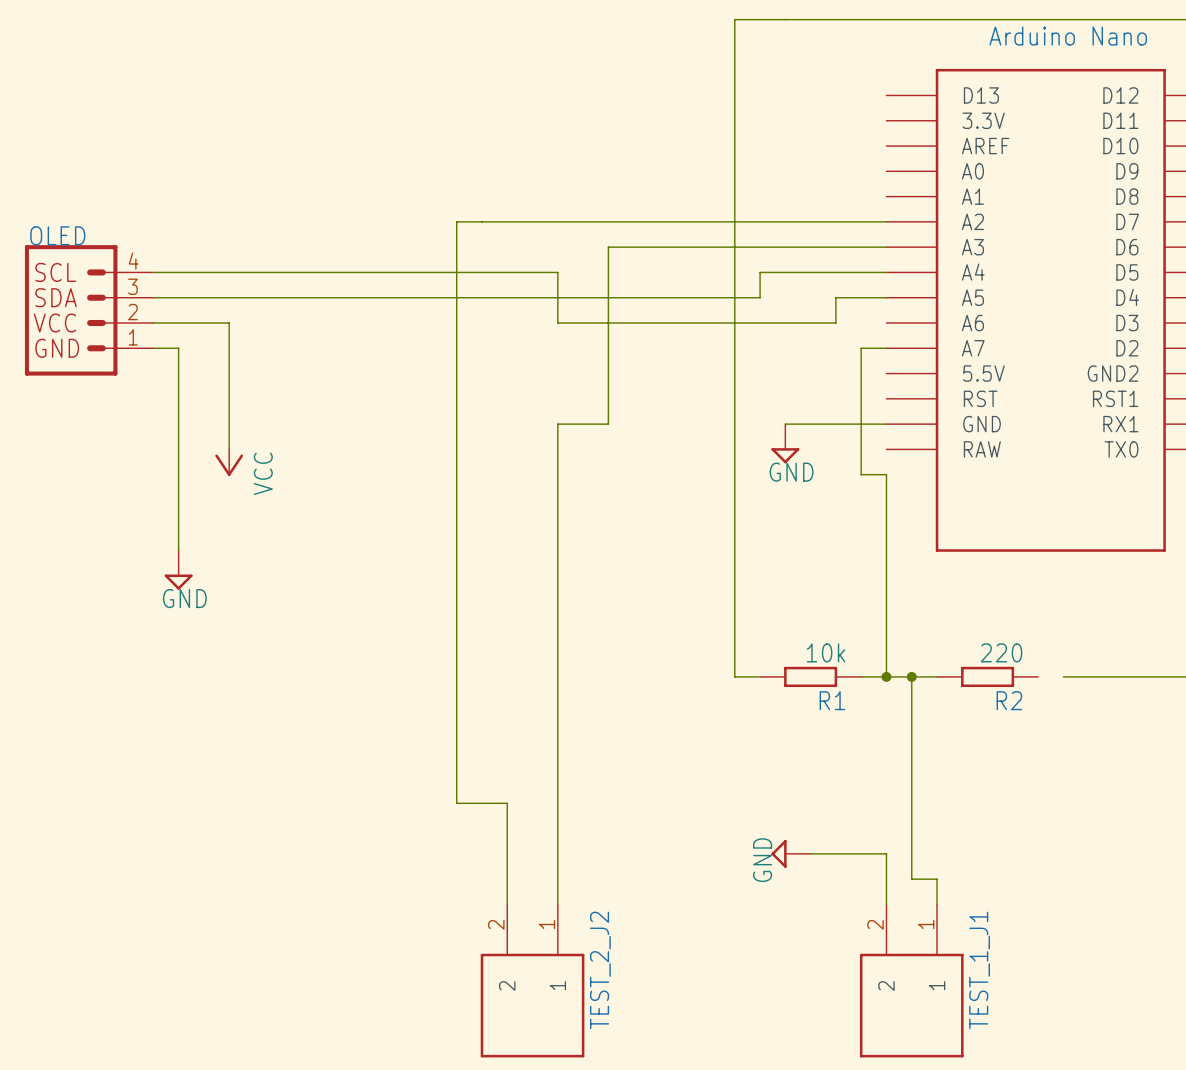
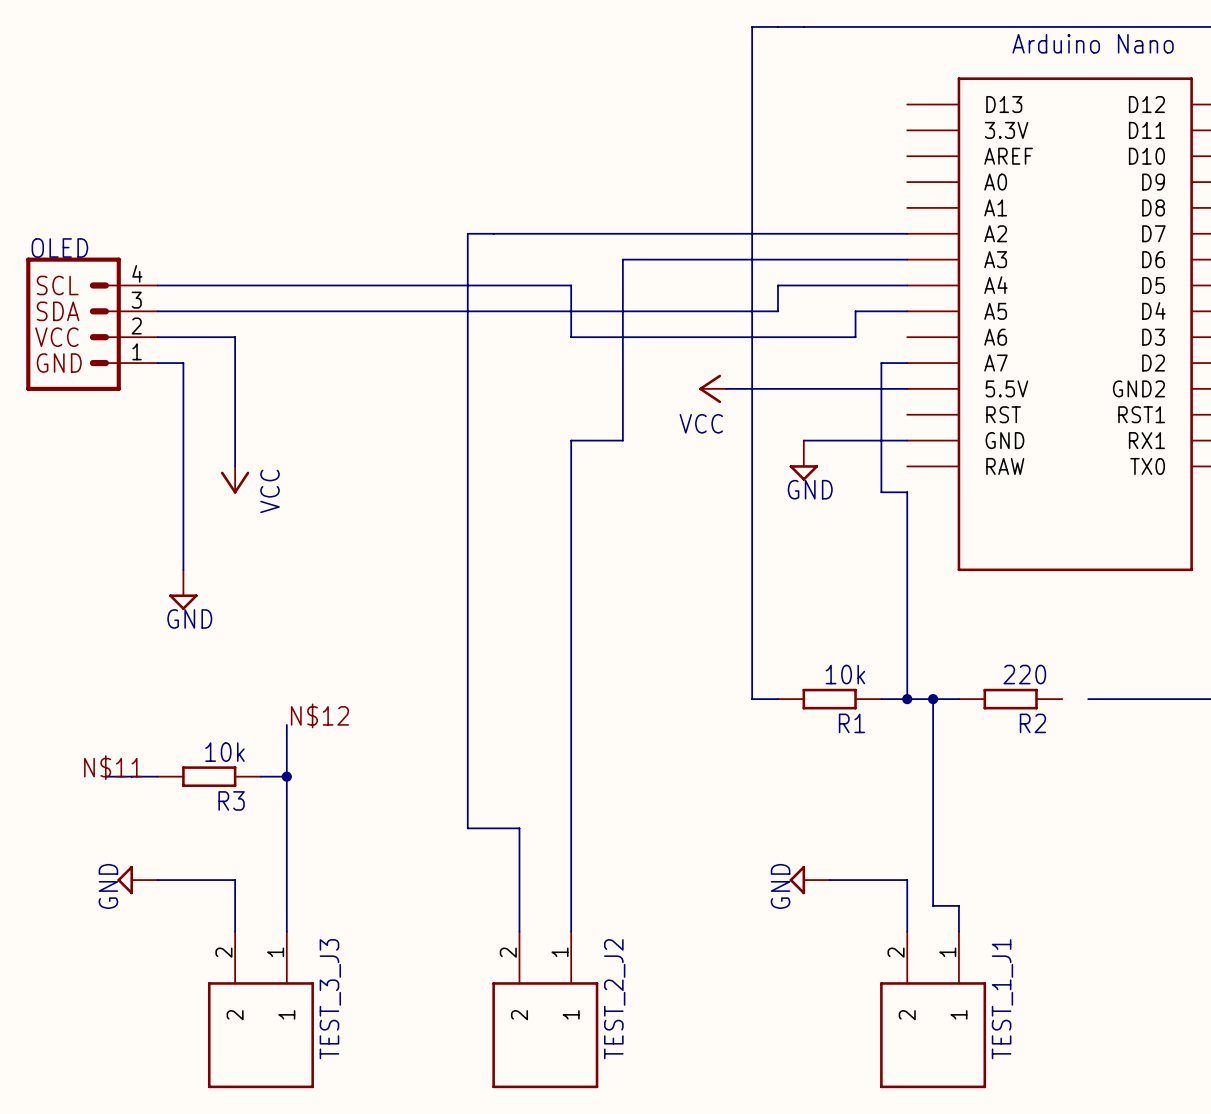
power symbol: none -> VCC (712, 388)
wire: none -> (726, 388) (907, 388)
label: none -> N$12 (319, 715)
wire: none -> (286, 724) (286, 931)
label: none -> N$11 (113, 767)
wire: none -> (105, 776) (157, 776)
R3: none -> 10k (209, 776)
wire: none -> (260, 776) (286, 776)
junction: none -> (286, 776)
power symbol: none -> GND (137, 880)
wire: none -> (157, 880) (235, 880) (235, 931)
TEST_3_J3: none -> (260, 1009)

